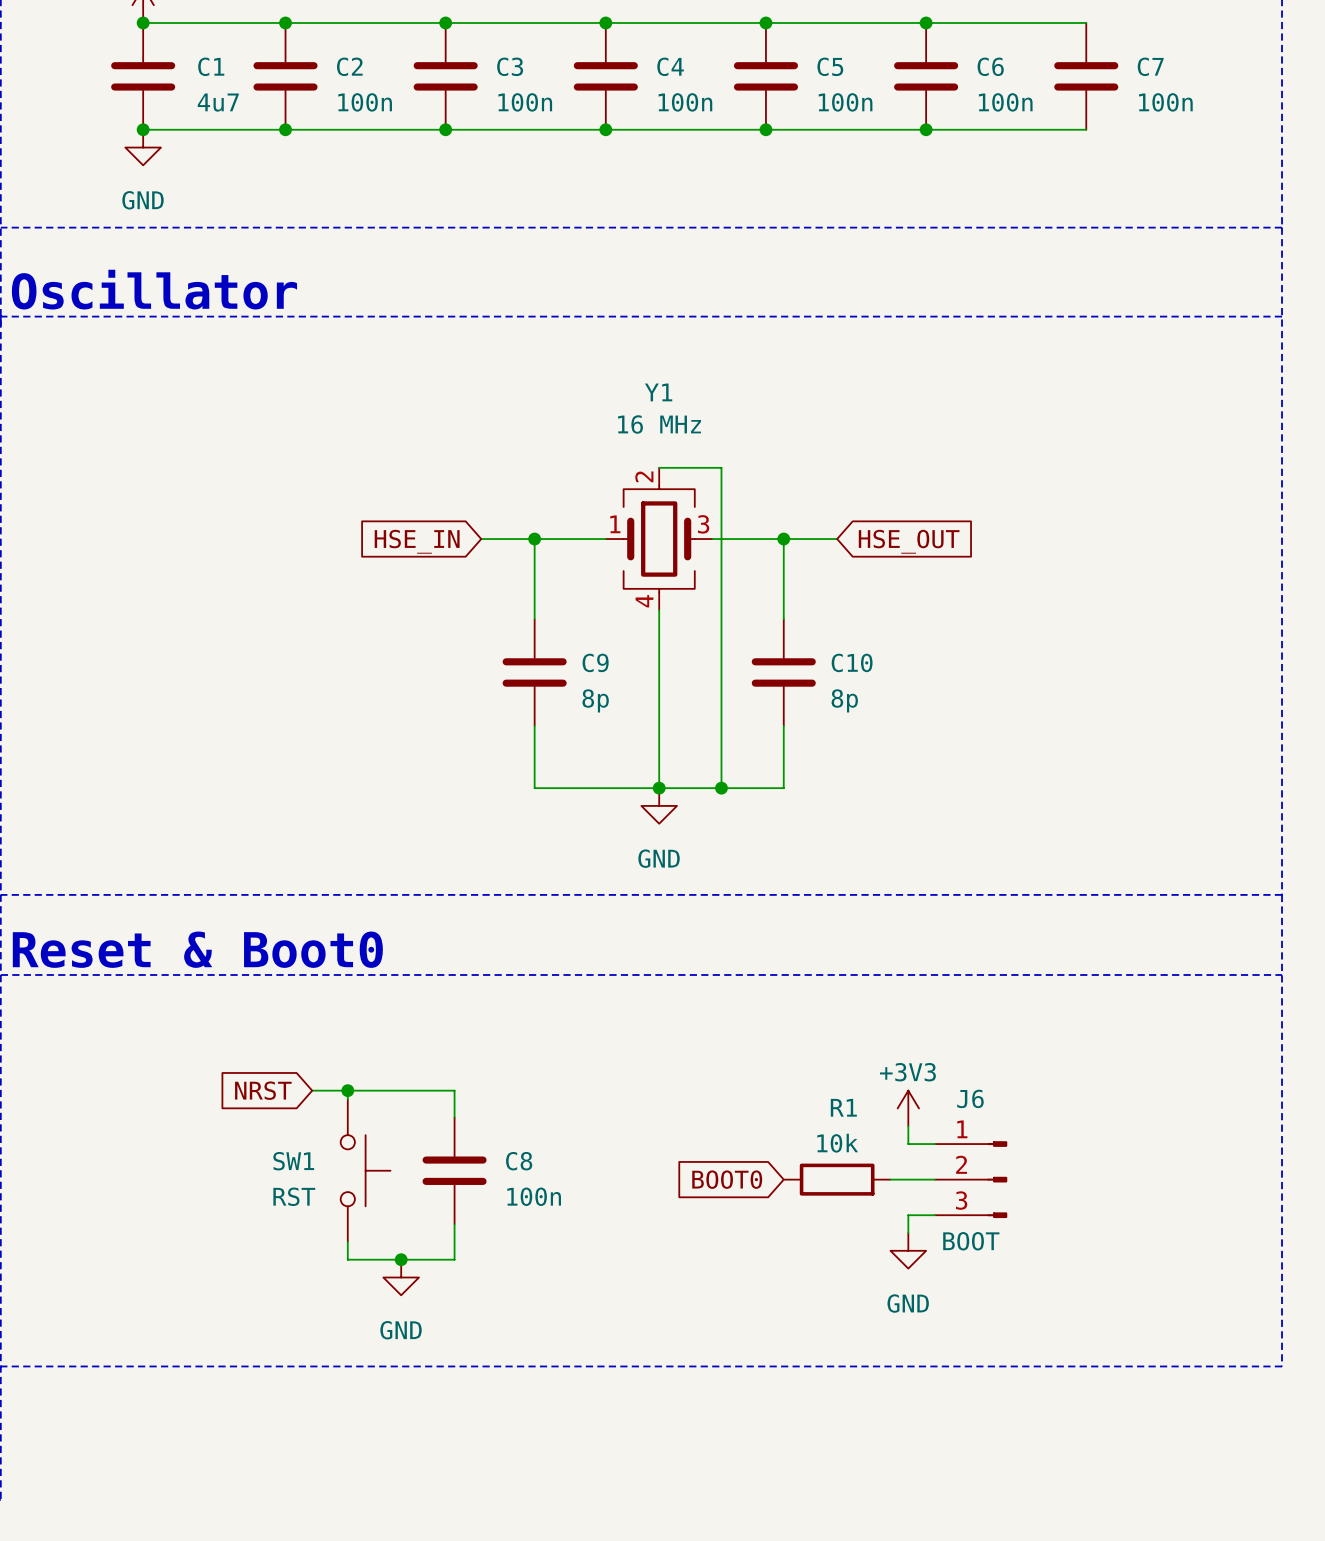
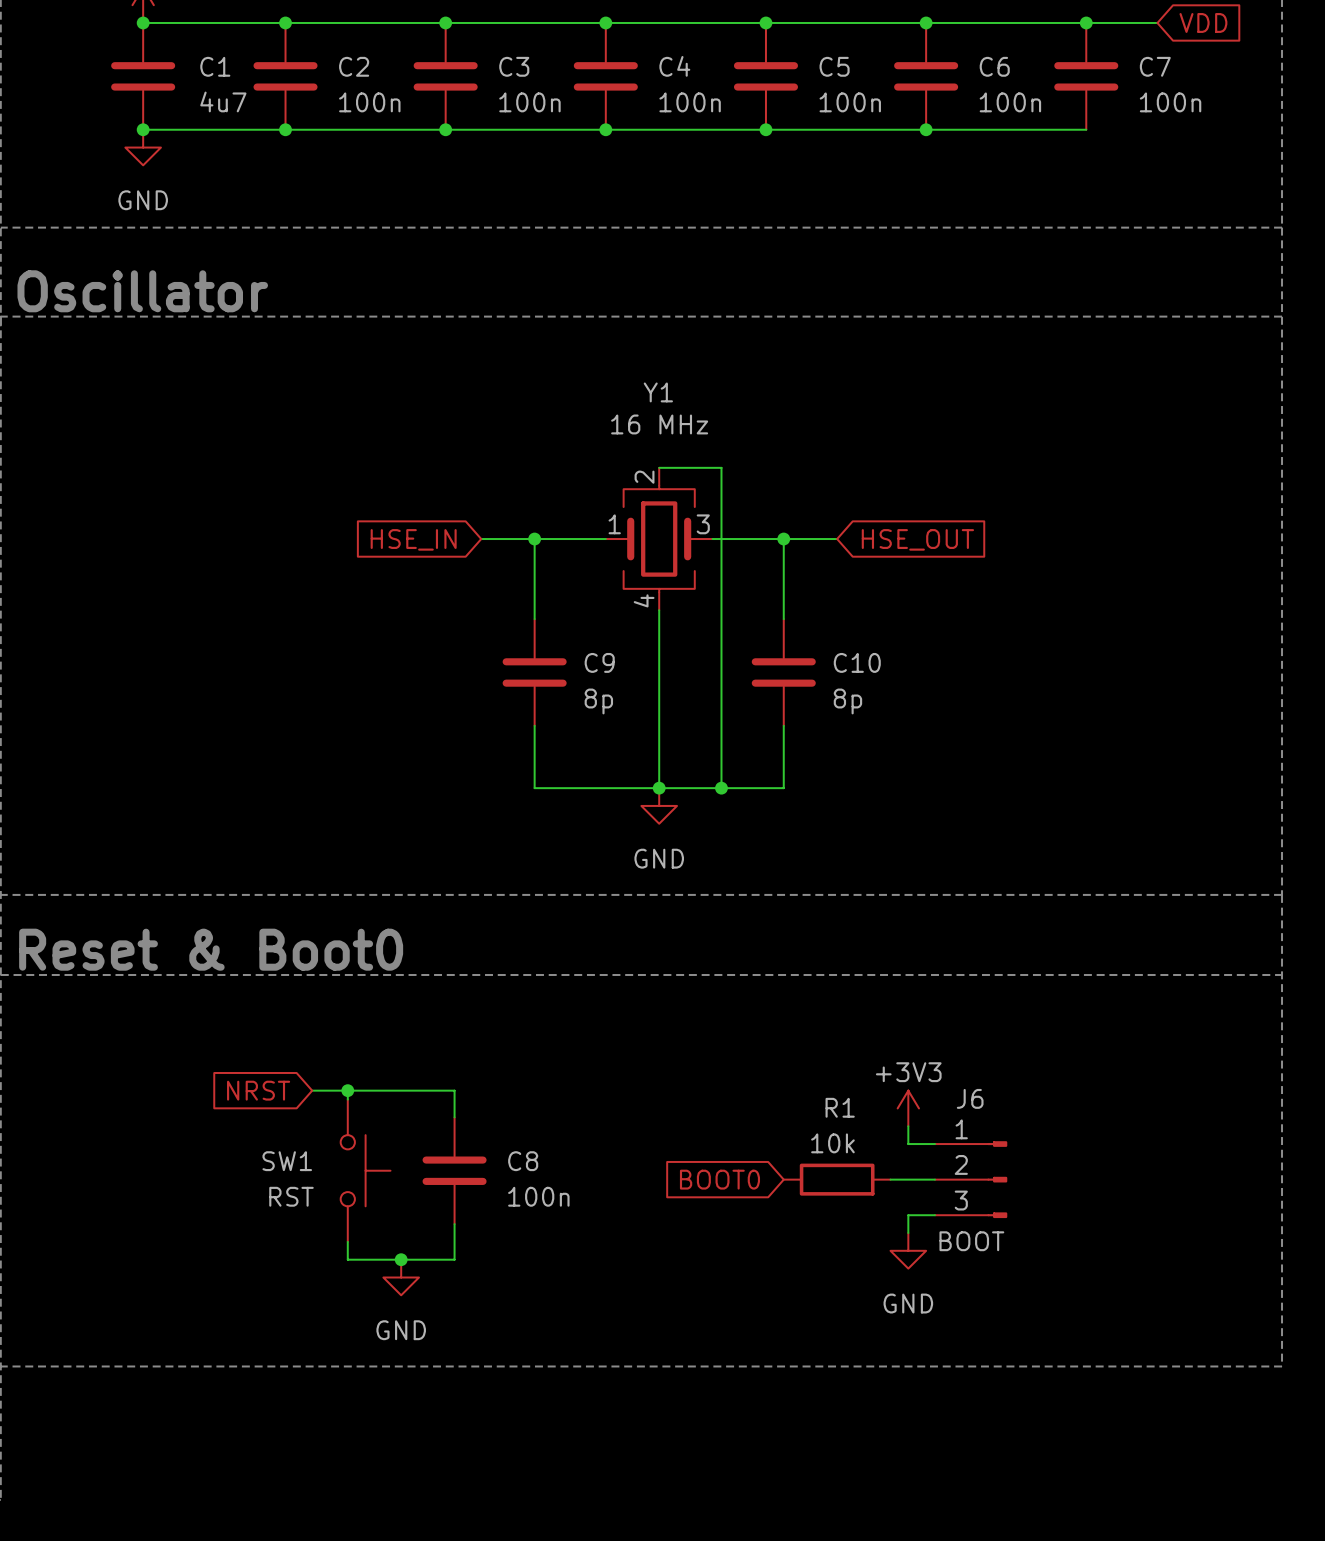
wire: none -> (1086, 22) (1157, 22)
junction: none -> (1086, 22)
global label: none -> VDD (1203, 22)

